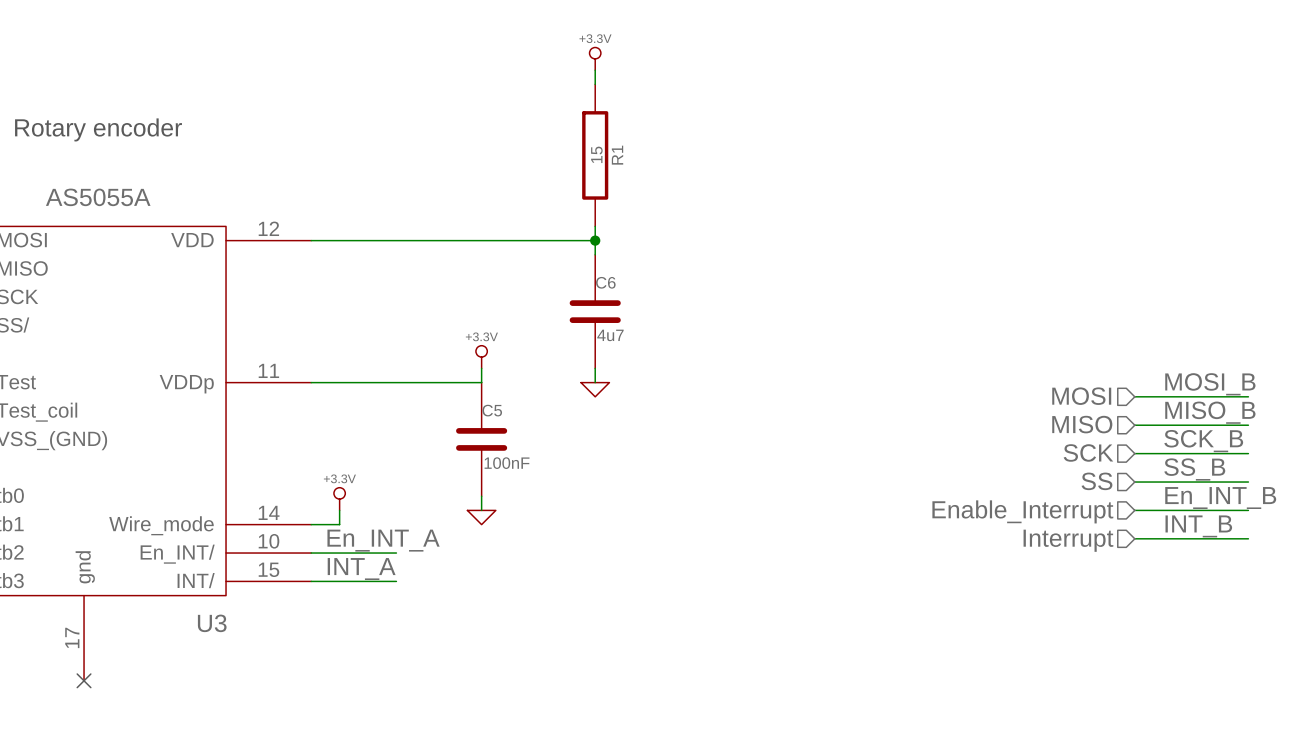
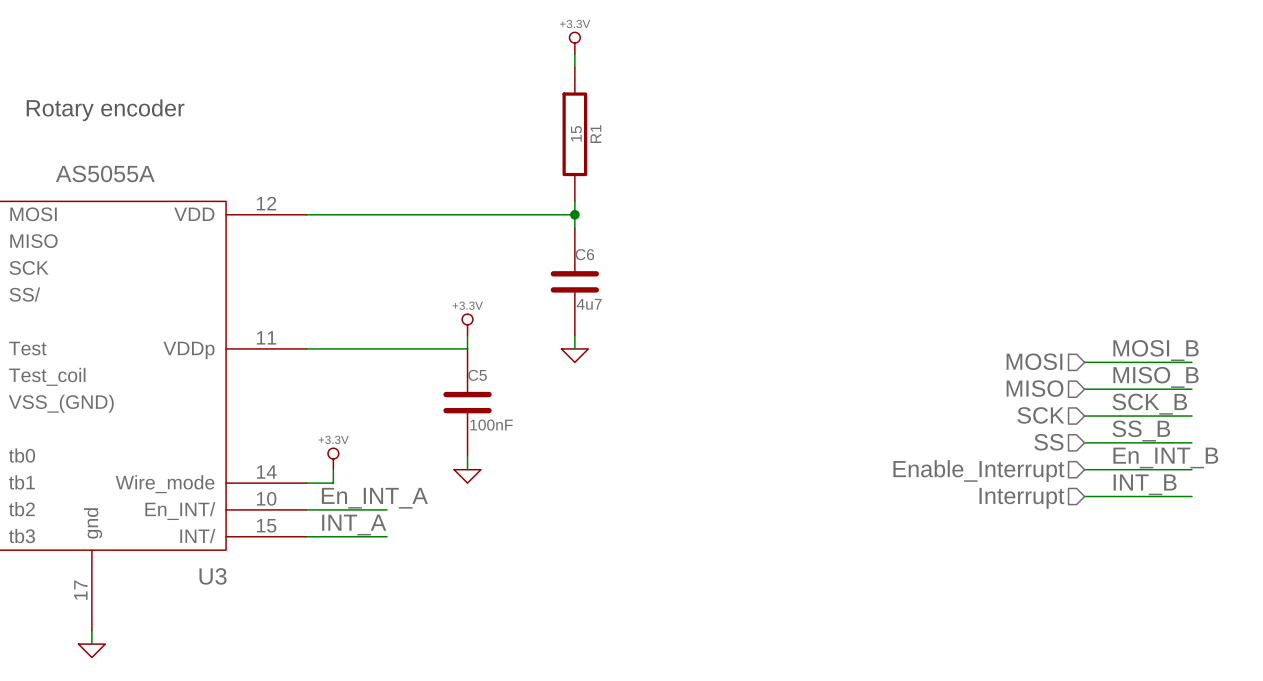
wire: none -> (91, 630) (91, 644)
no-connect mark: (84, 680) -> none
power symbol: none -> (91, 650)

